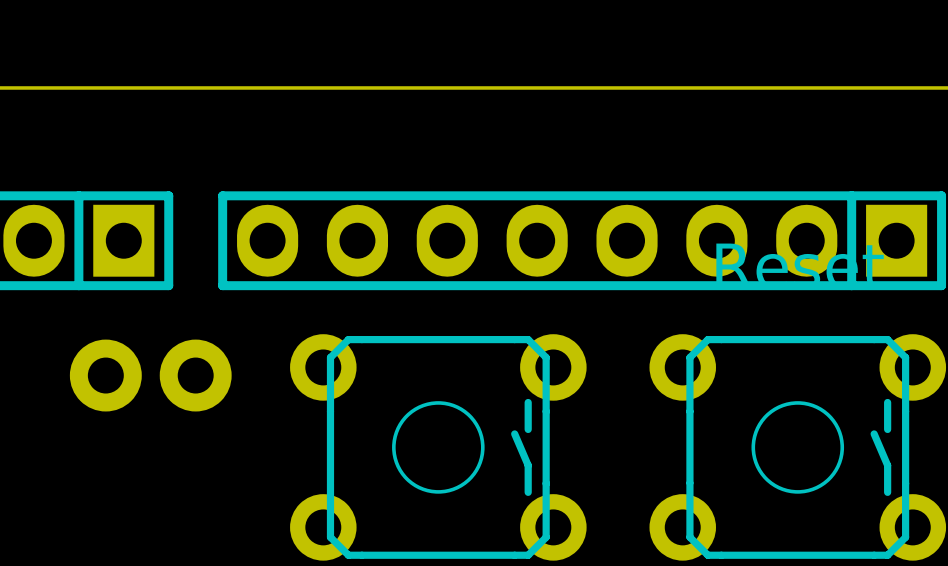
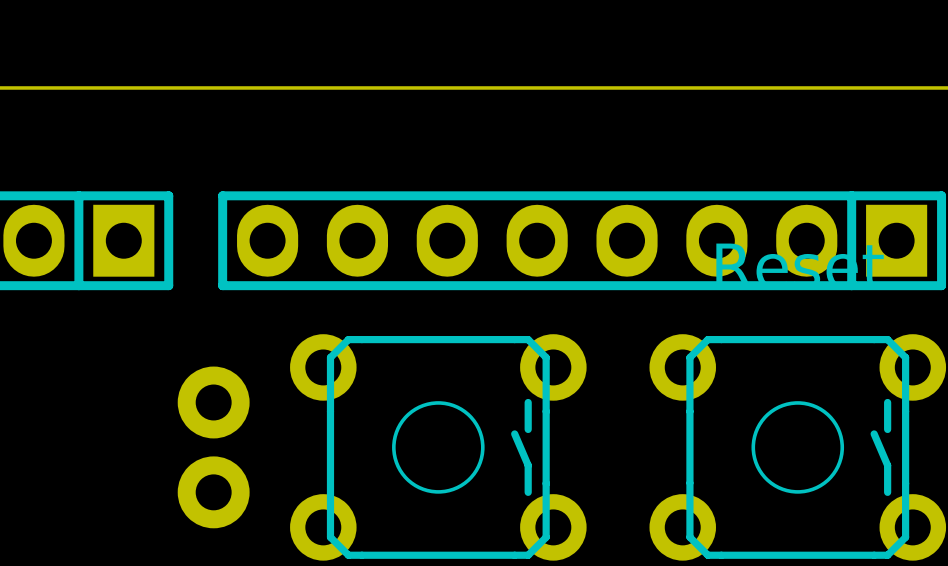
part rotation: 0° (150, 375) -> 90° clockwise (213, 447)

